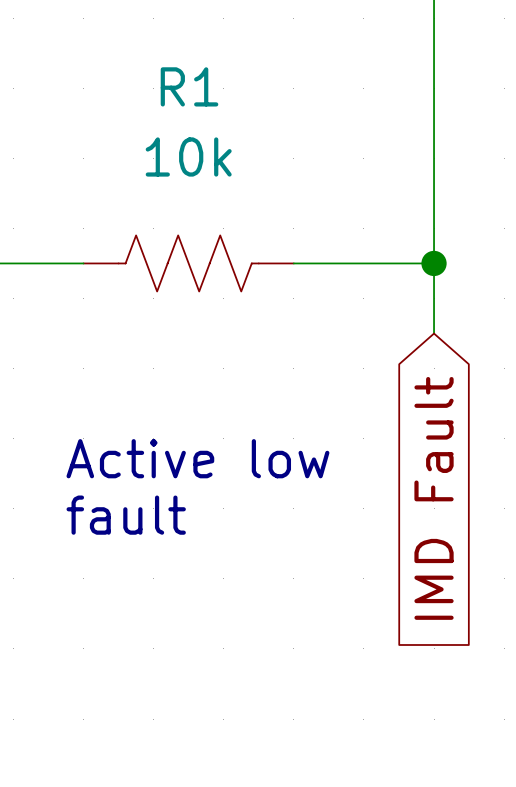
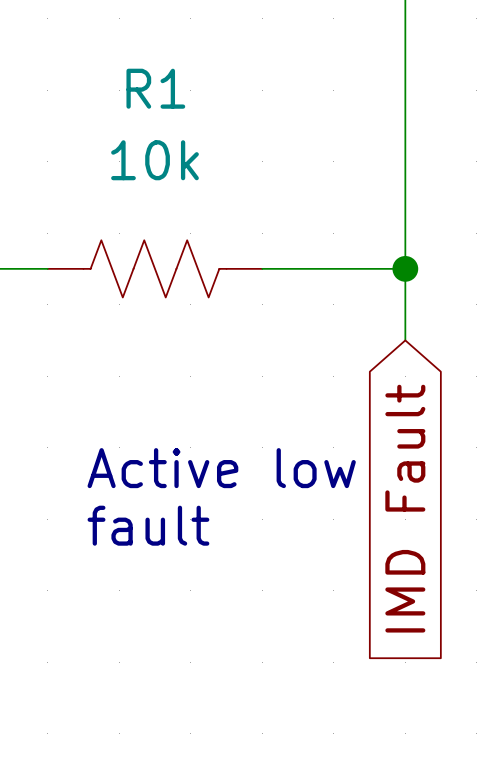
text position: Active low (197, 458) -> Active low (221, 468)
text position: fault (126, 515) -> fault (148, 525)

